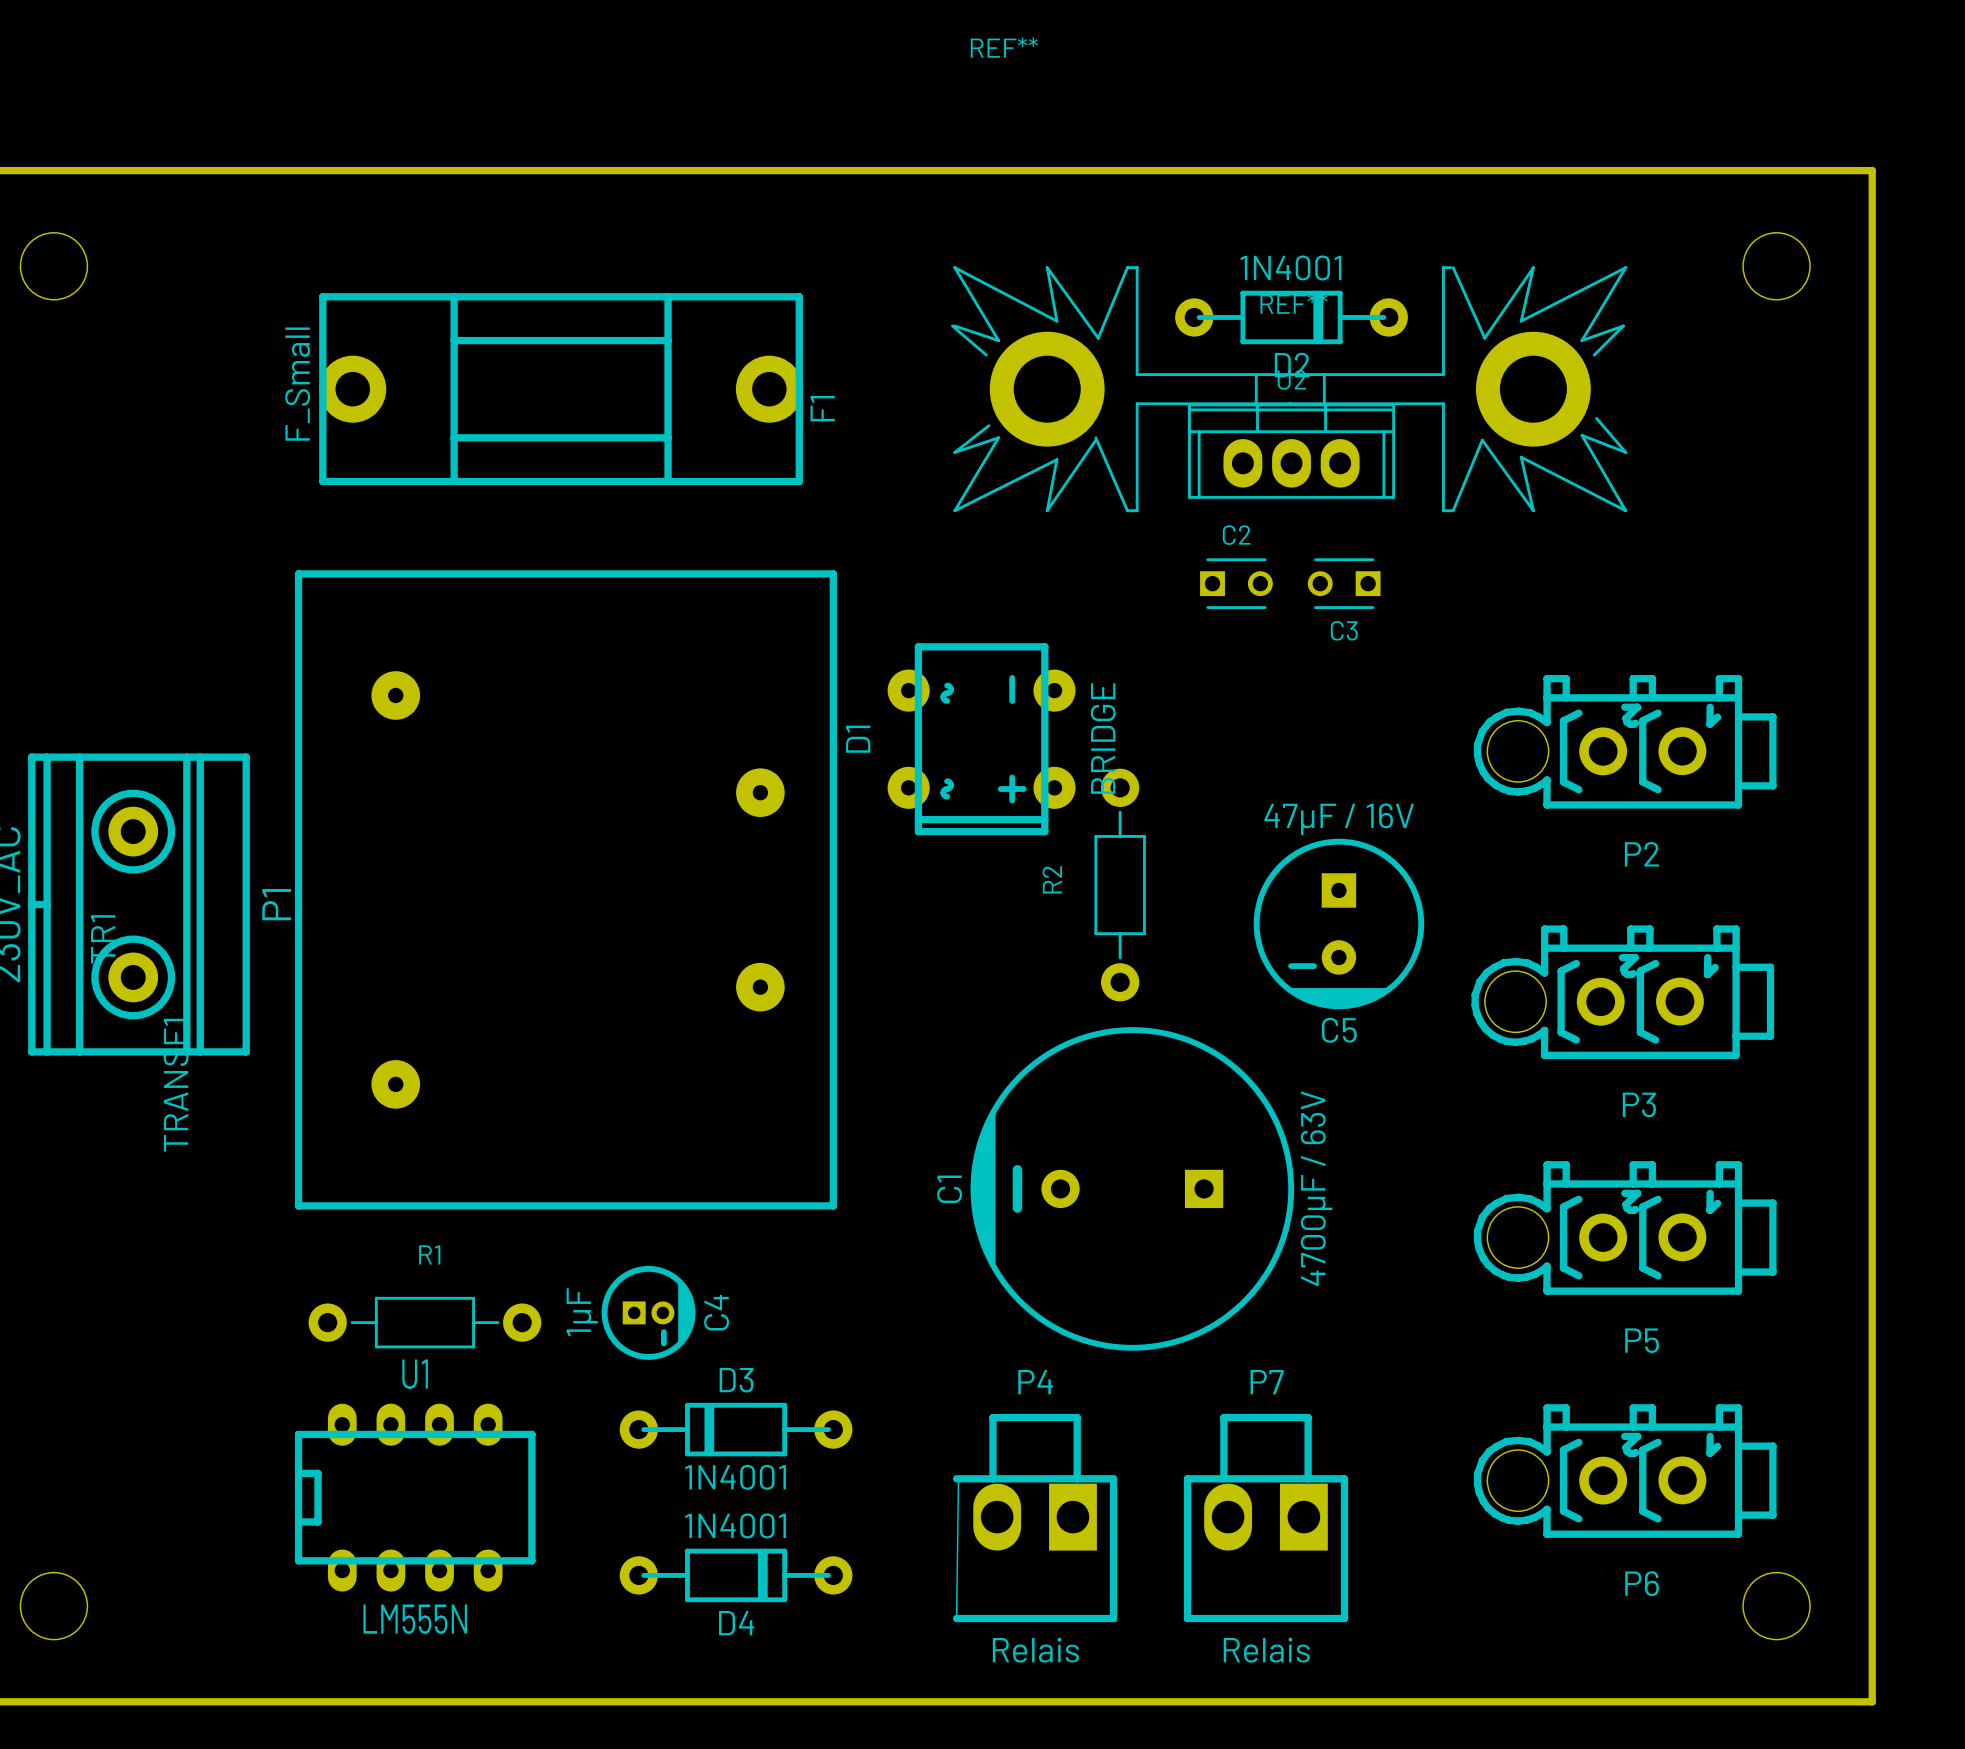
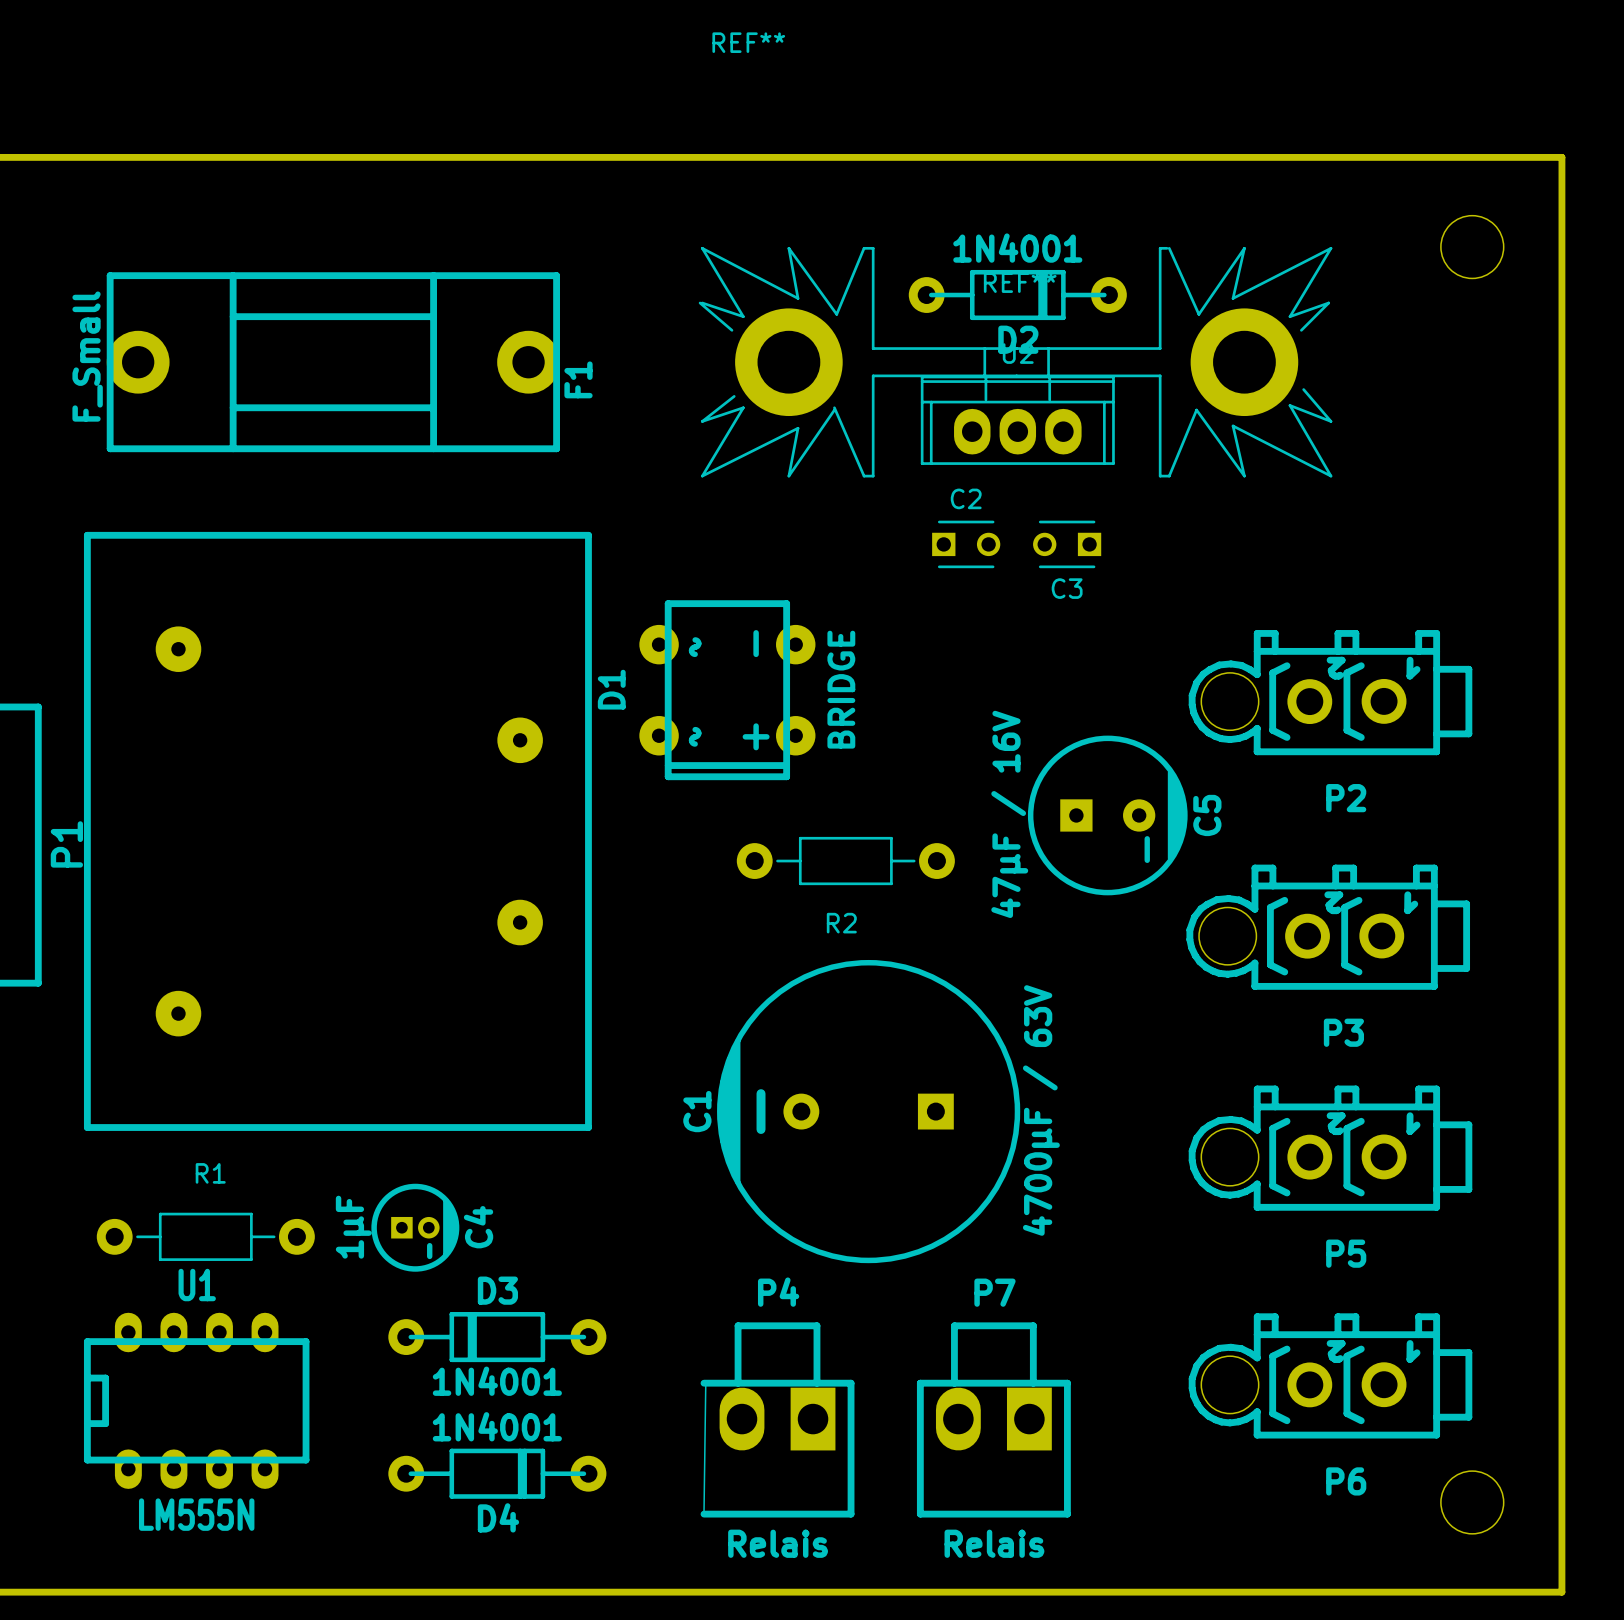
R2 name position: R2 (1052, 879) -> R2 (841, 923)
R2 rotation: 0° (1120, 885) -> 90° clockwise (845, 861)
C5 rotation: 0° (1338, 923) -> 90° counterclockwise (1107, 815)

